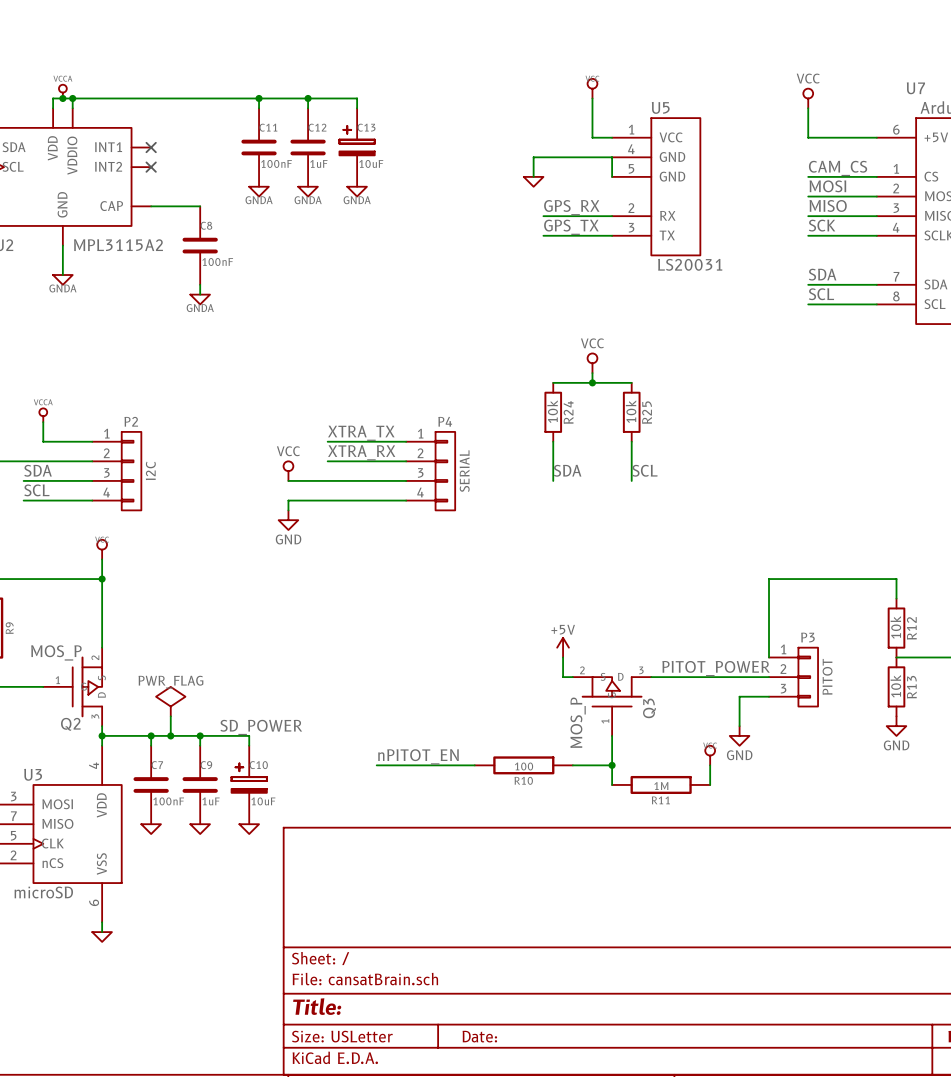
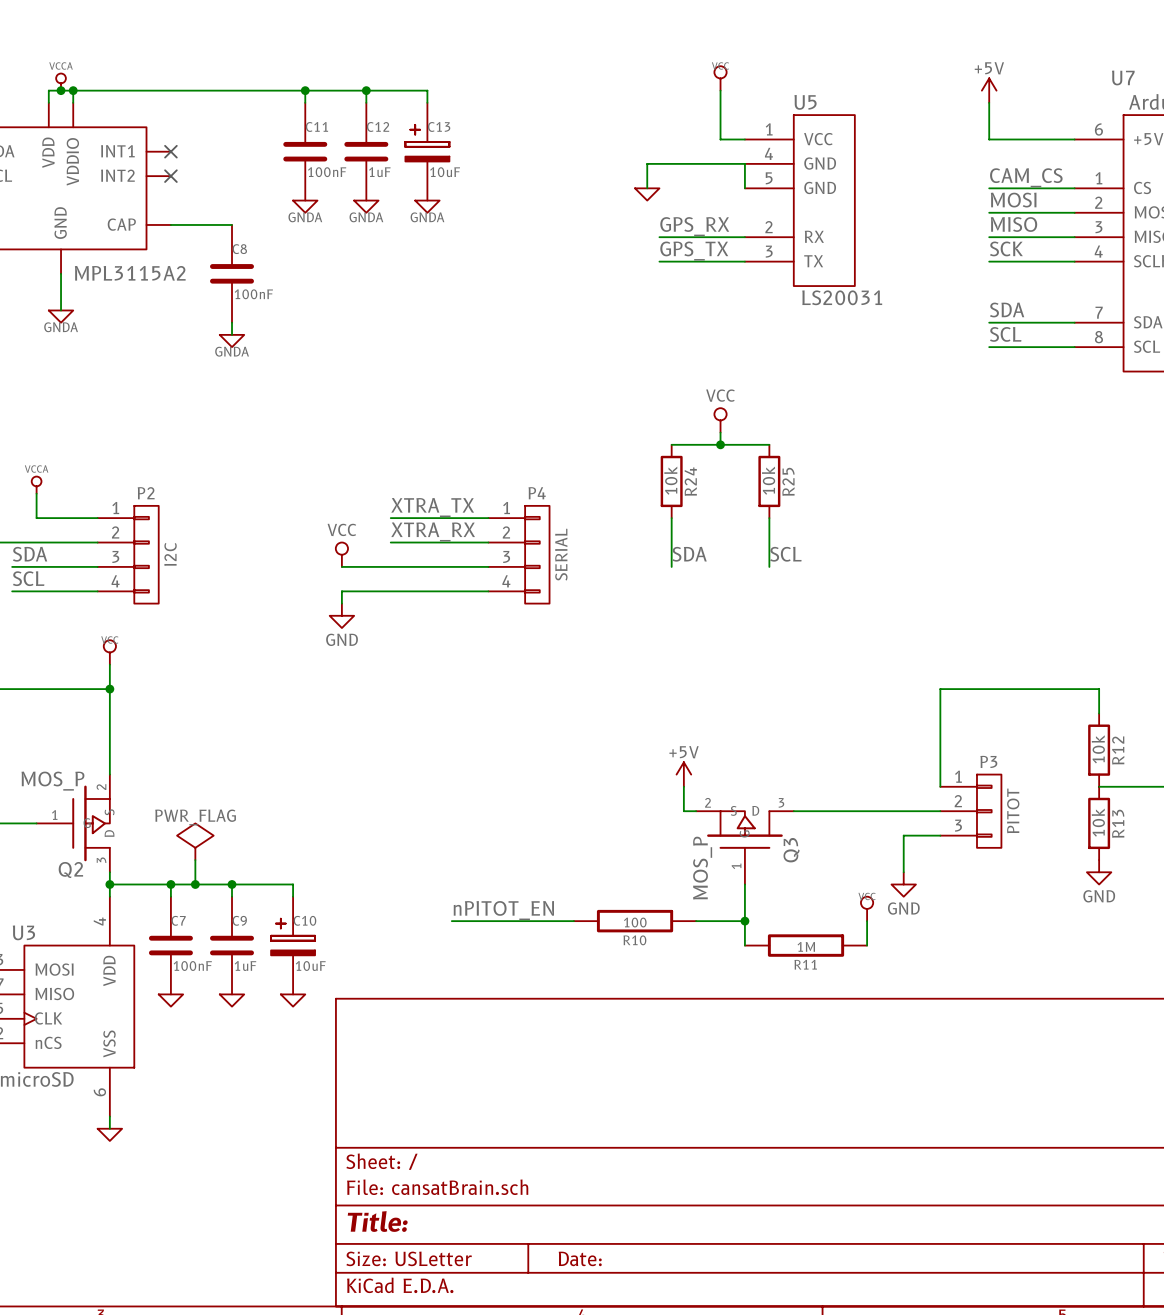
power symbol: VCC (808, 98) -> +5V (989, 90)
label: PITOT_POWER (716, 668) -> none
label: SD_POWER (261, 727) -> none

